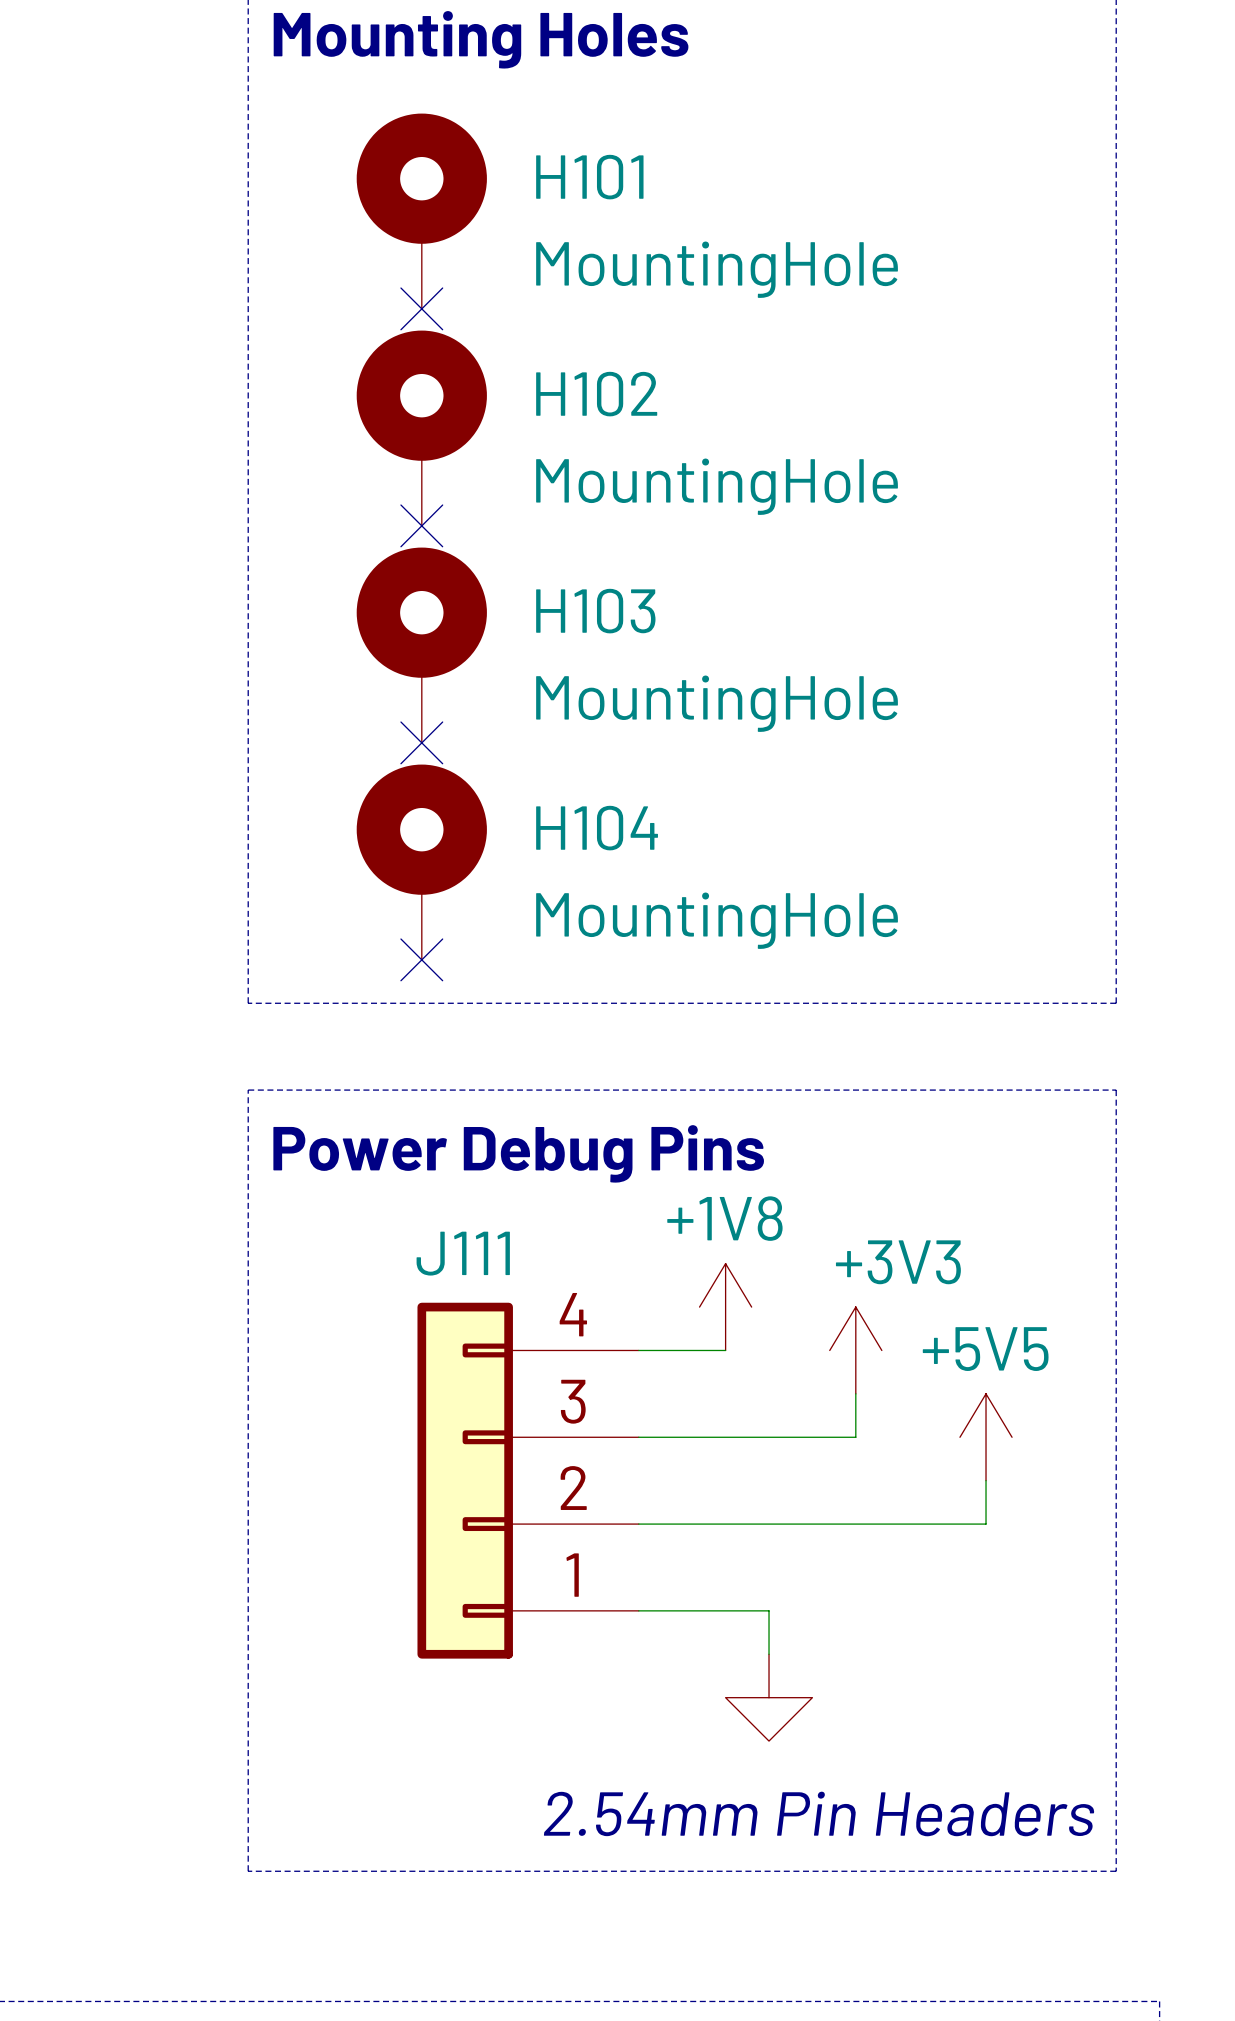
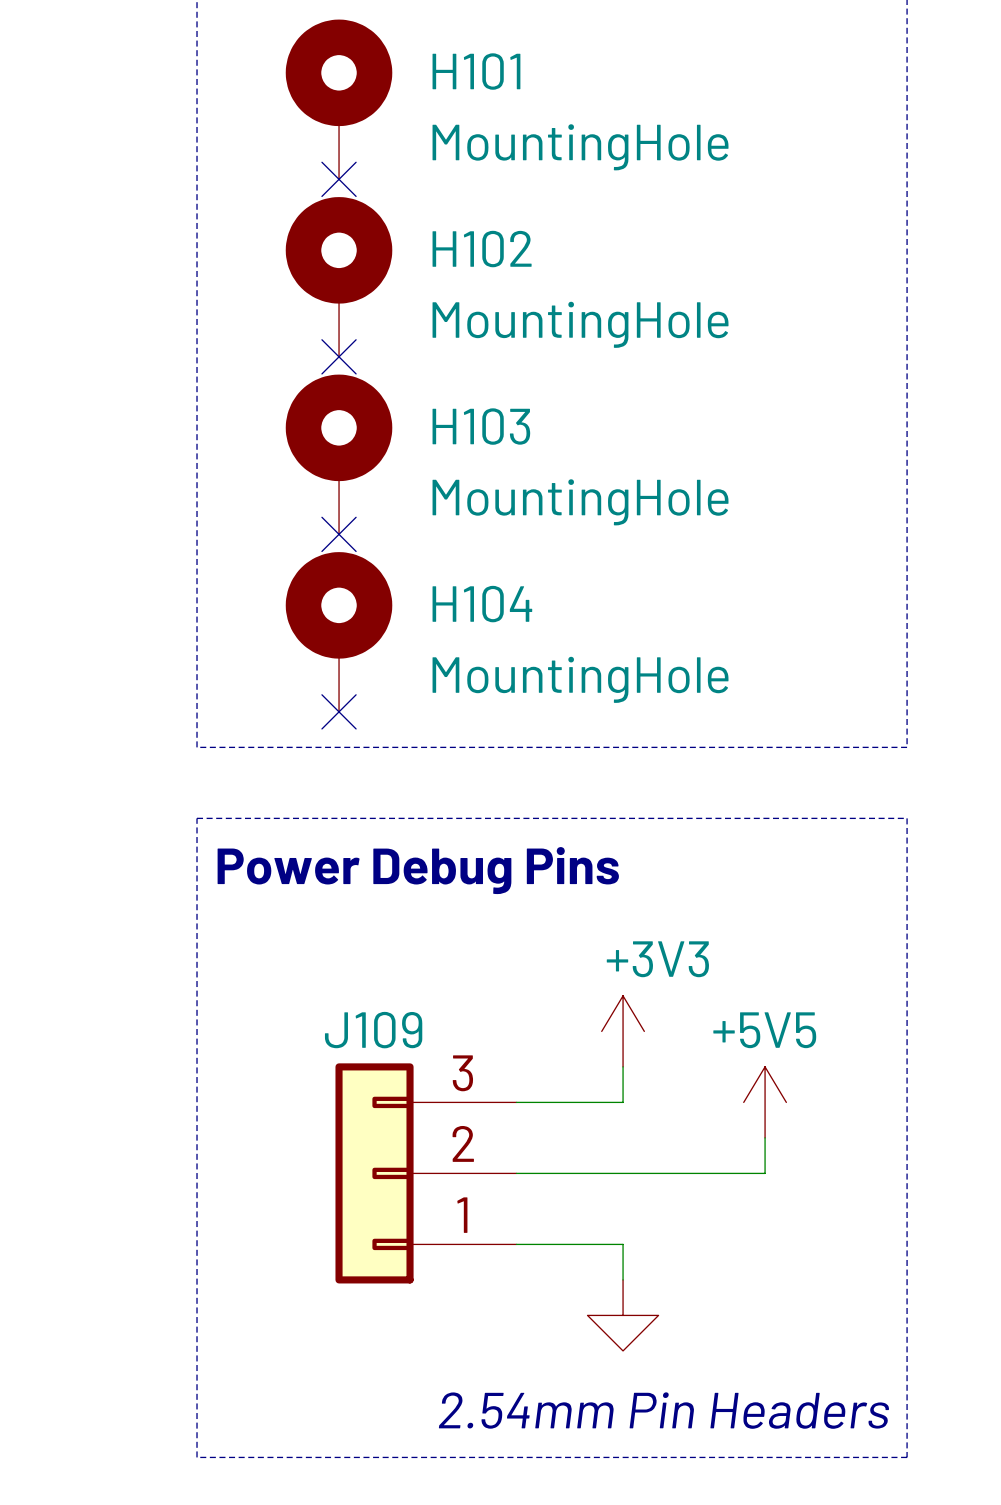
power symbol: +1V8 (725, 1307) -> none
wire: (638, 1350) (725, 1350) -> none
power symbol position: +3V3 (855, 1350) -> +3V3 (623, 1031)
wire: (855, 1393) (855, 1437) (769, 1437) -> (623, 1066) (623, 1102)
power symbol position: +5V5 (986, 1437) -> +5V5 (765, 1102)
J111: (528, 1480) -> none
wire: (986, 1480) (986, 1524) (942, 1524) -> (765, 1137) (765, 1173)
J109: none -> (426, 1173)

